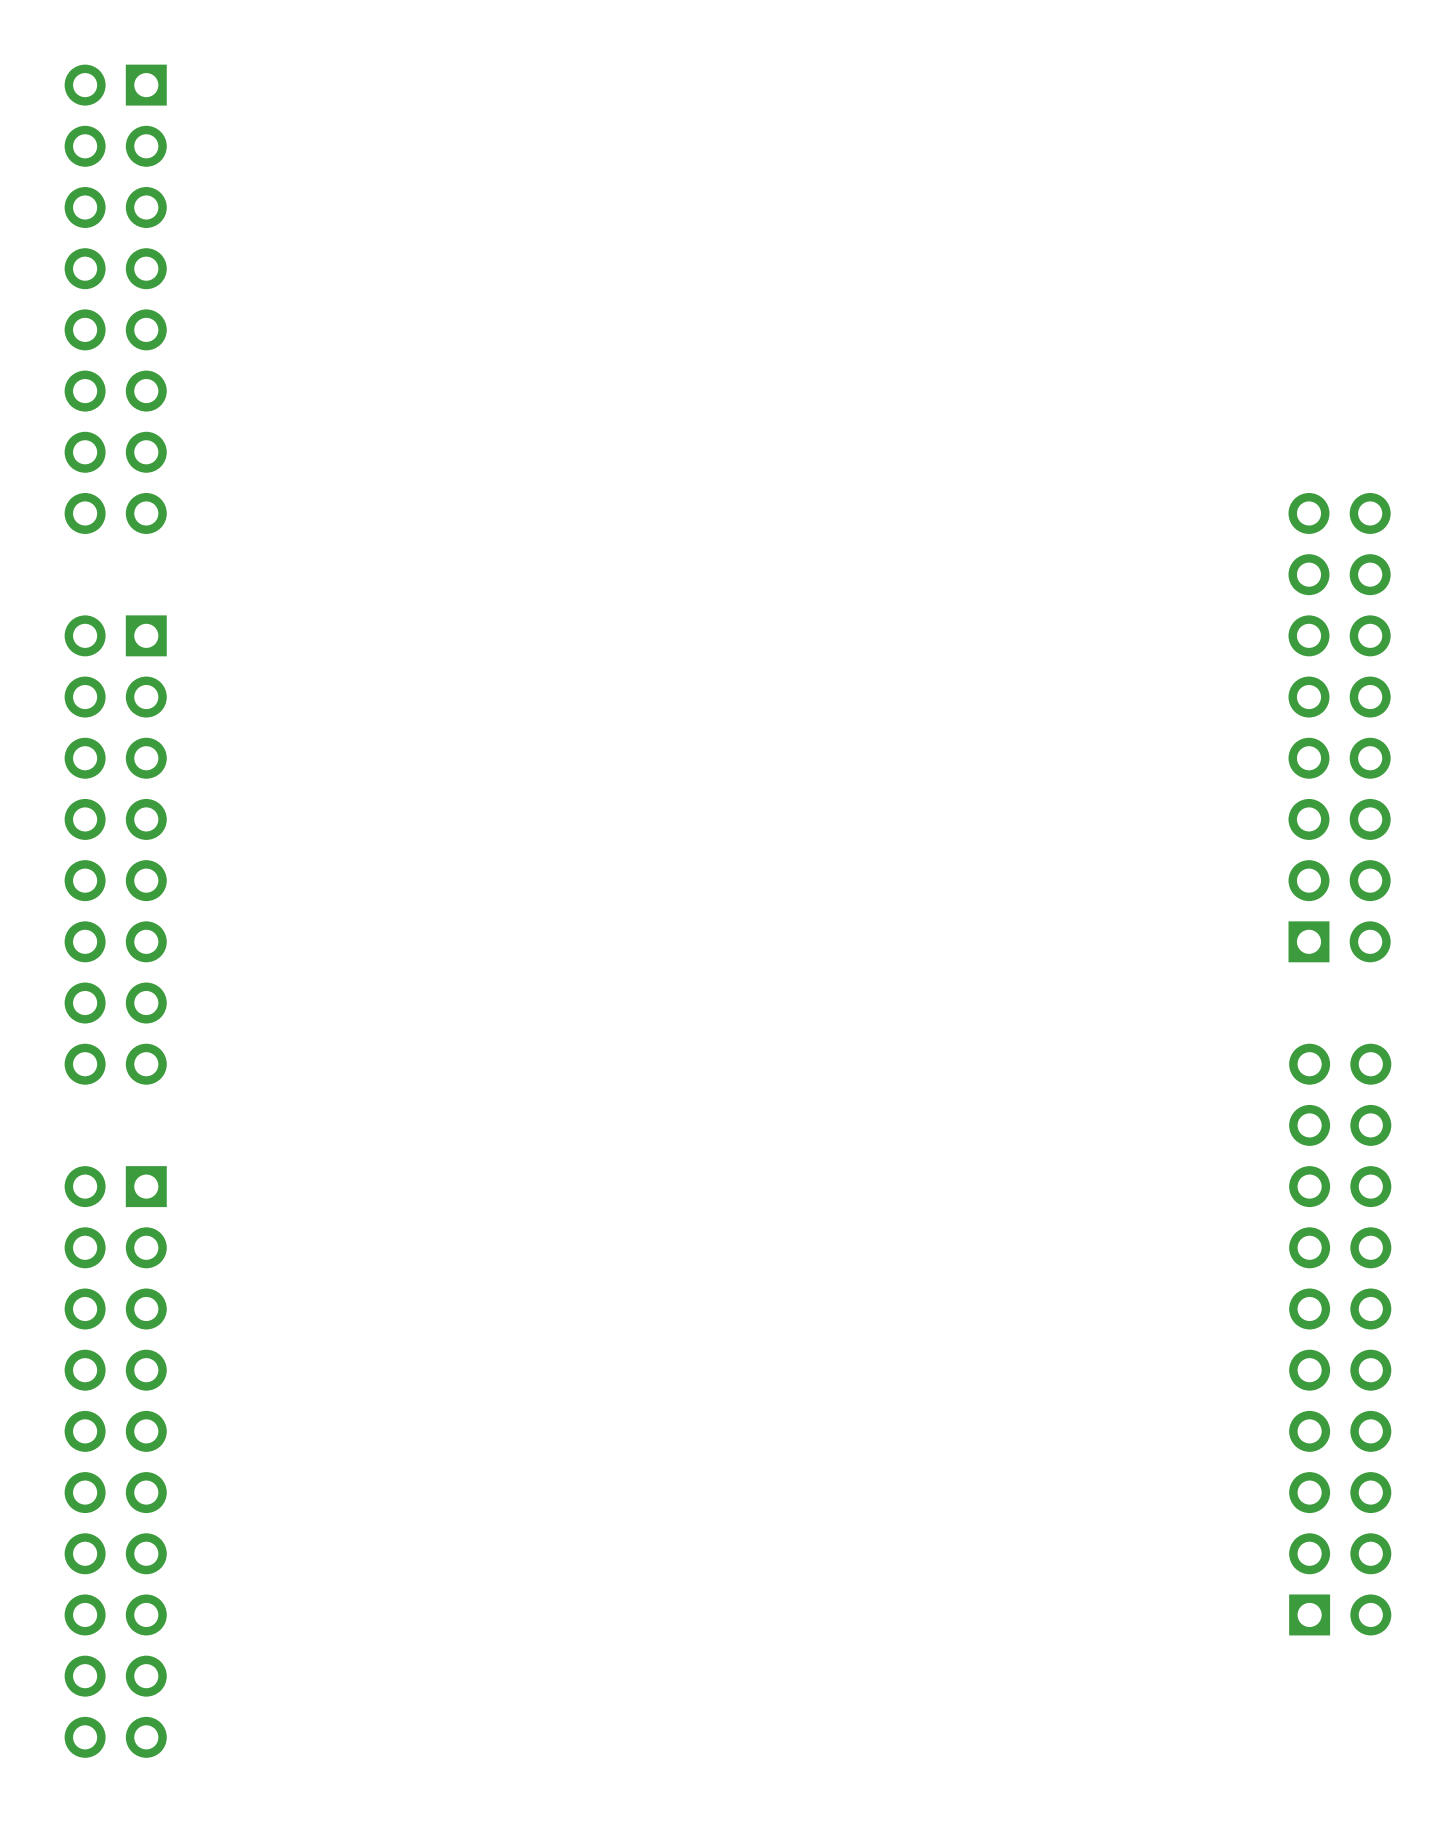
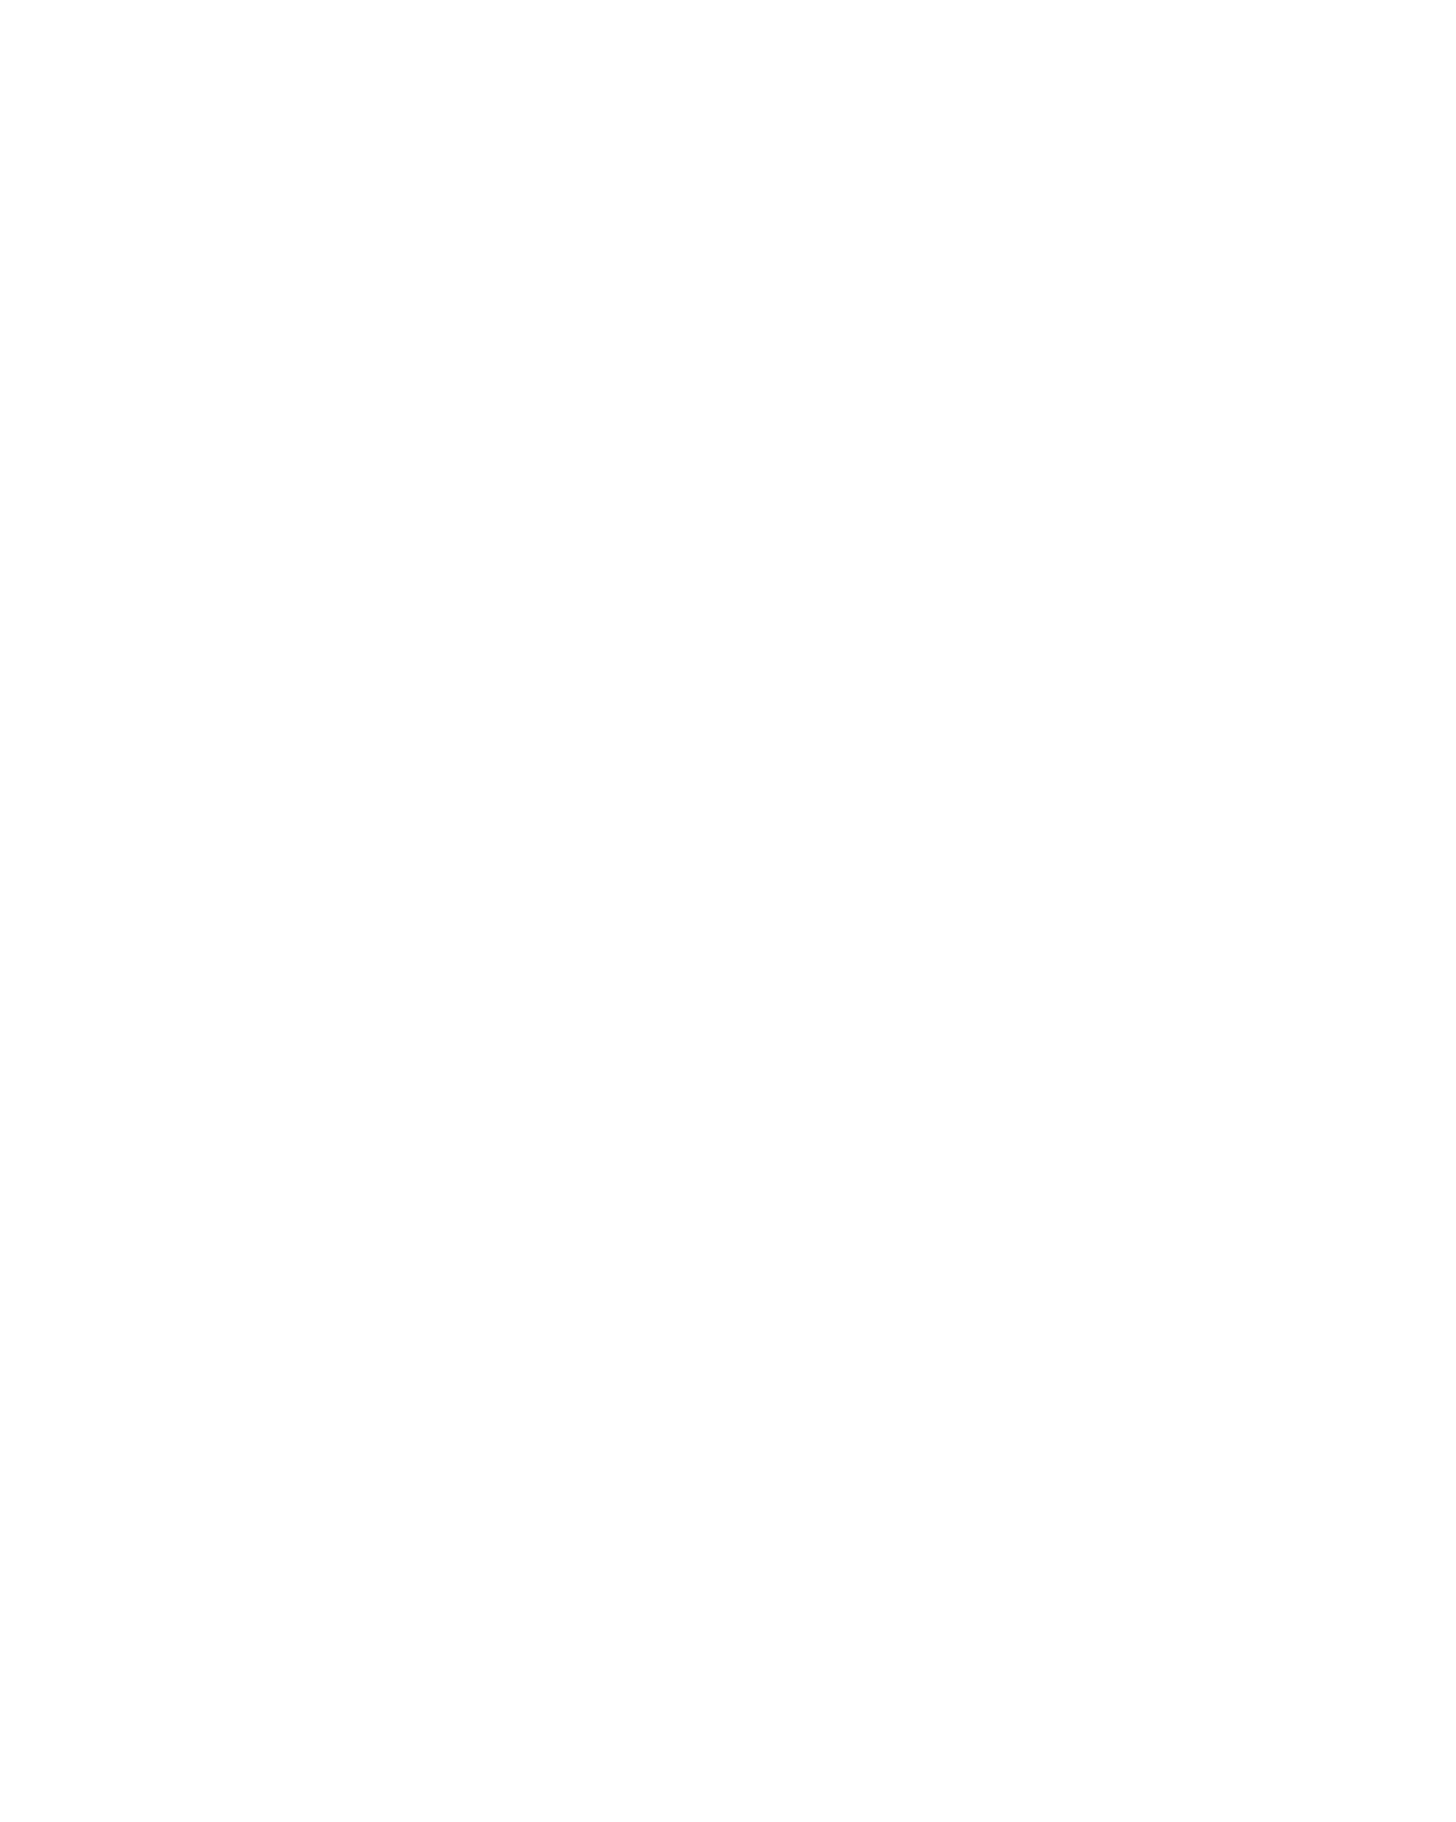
part: (115, 299) -> none
part: (1339, 727) -> none
part: (115, 850) -> none
part: (1340, 1339) -> none
part: (115, 1461) -> none

